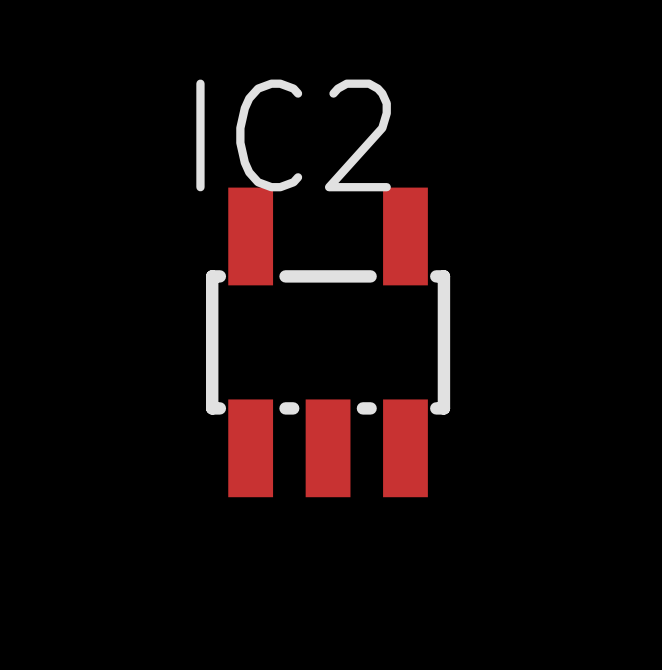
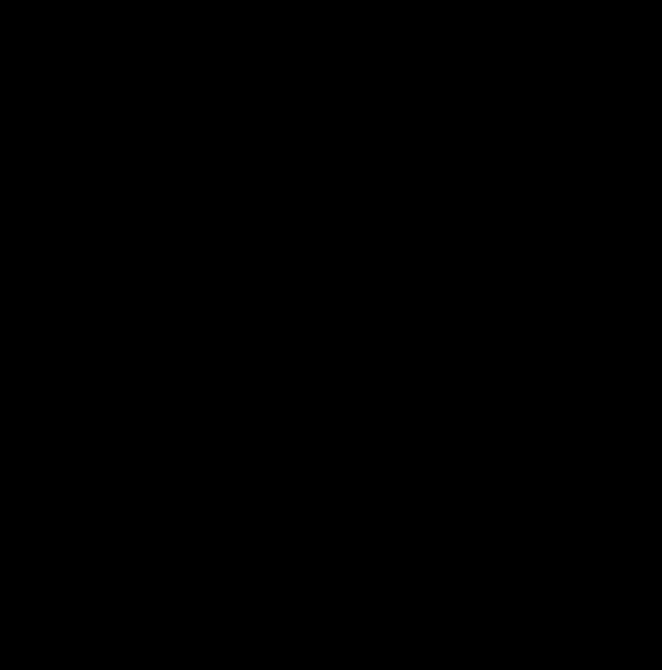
IC2: (328, 342) -> none

